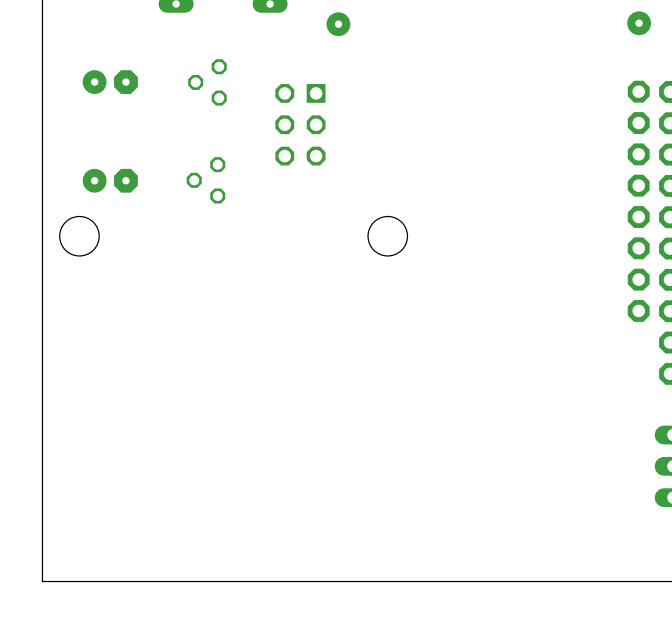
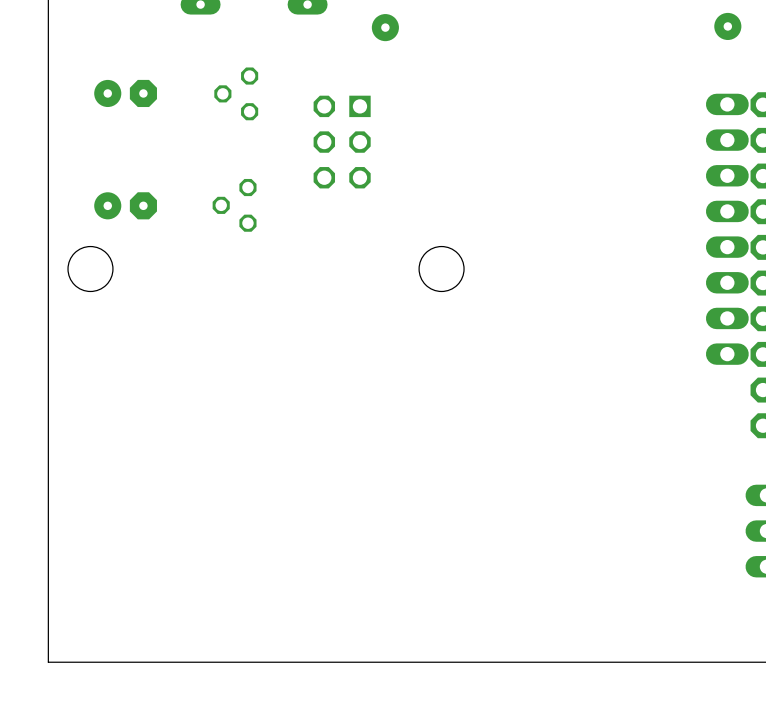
part footprint: [627, 80, 650, 322] -> [705, 93, 749, 365]

